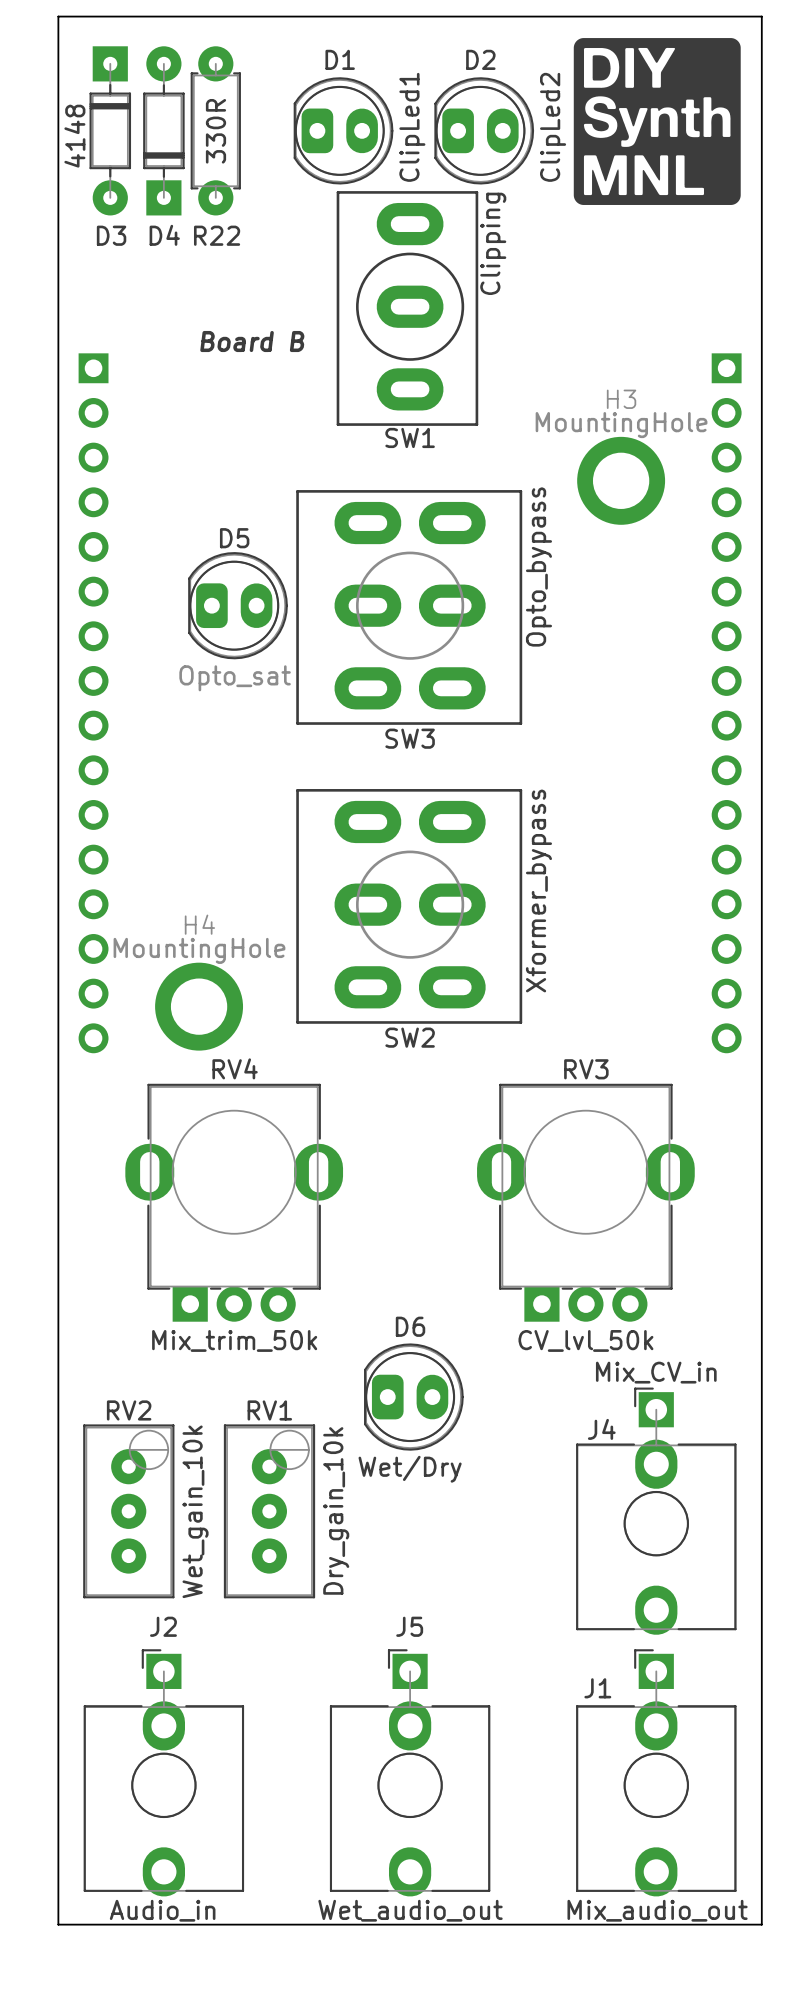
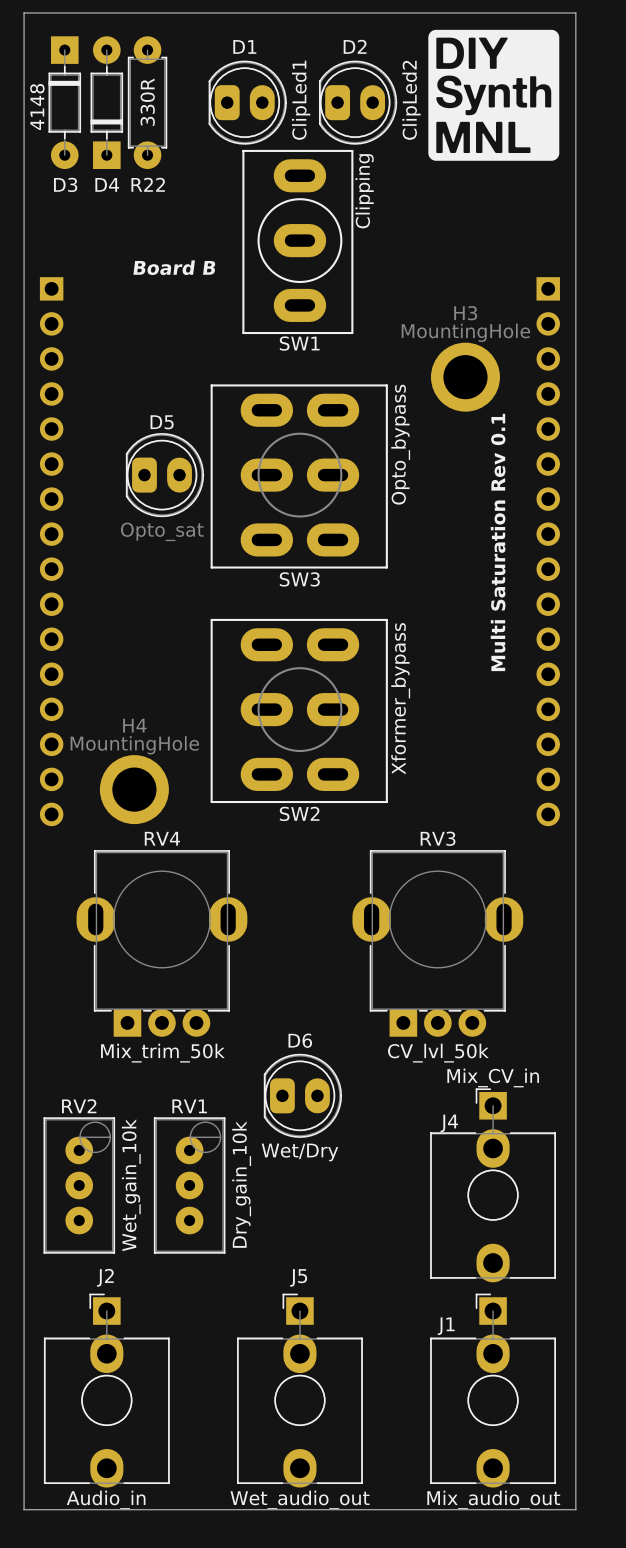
text: none -> Multi Saturation Rev 0.1 (498, 542)

